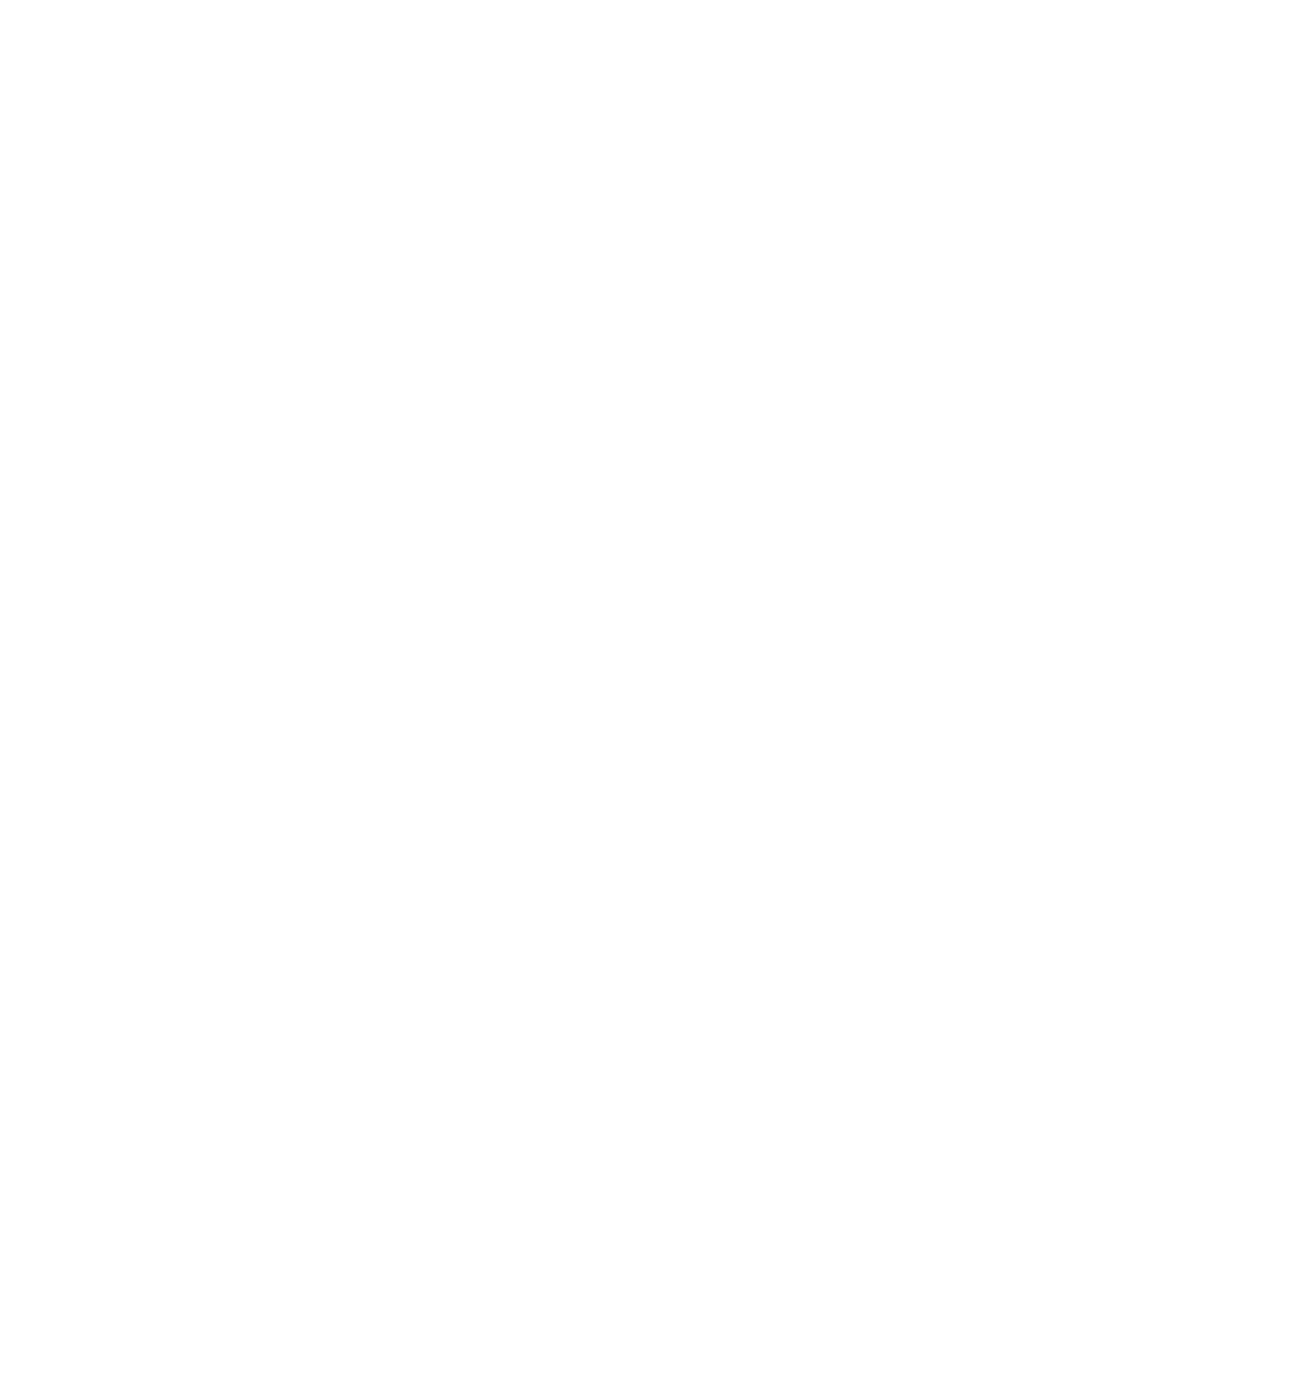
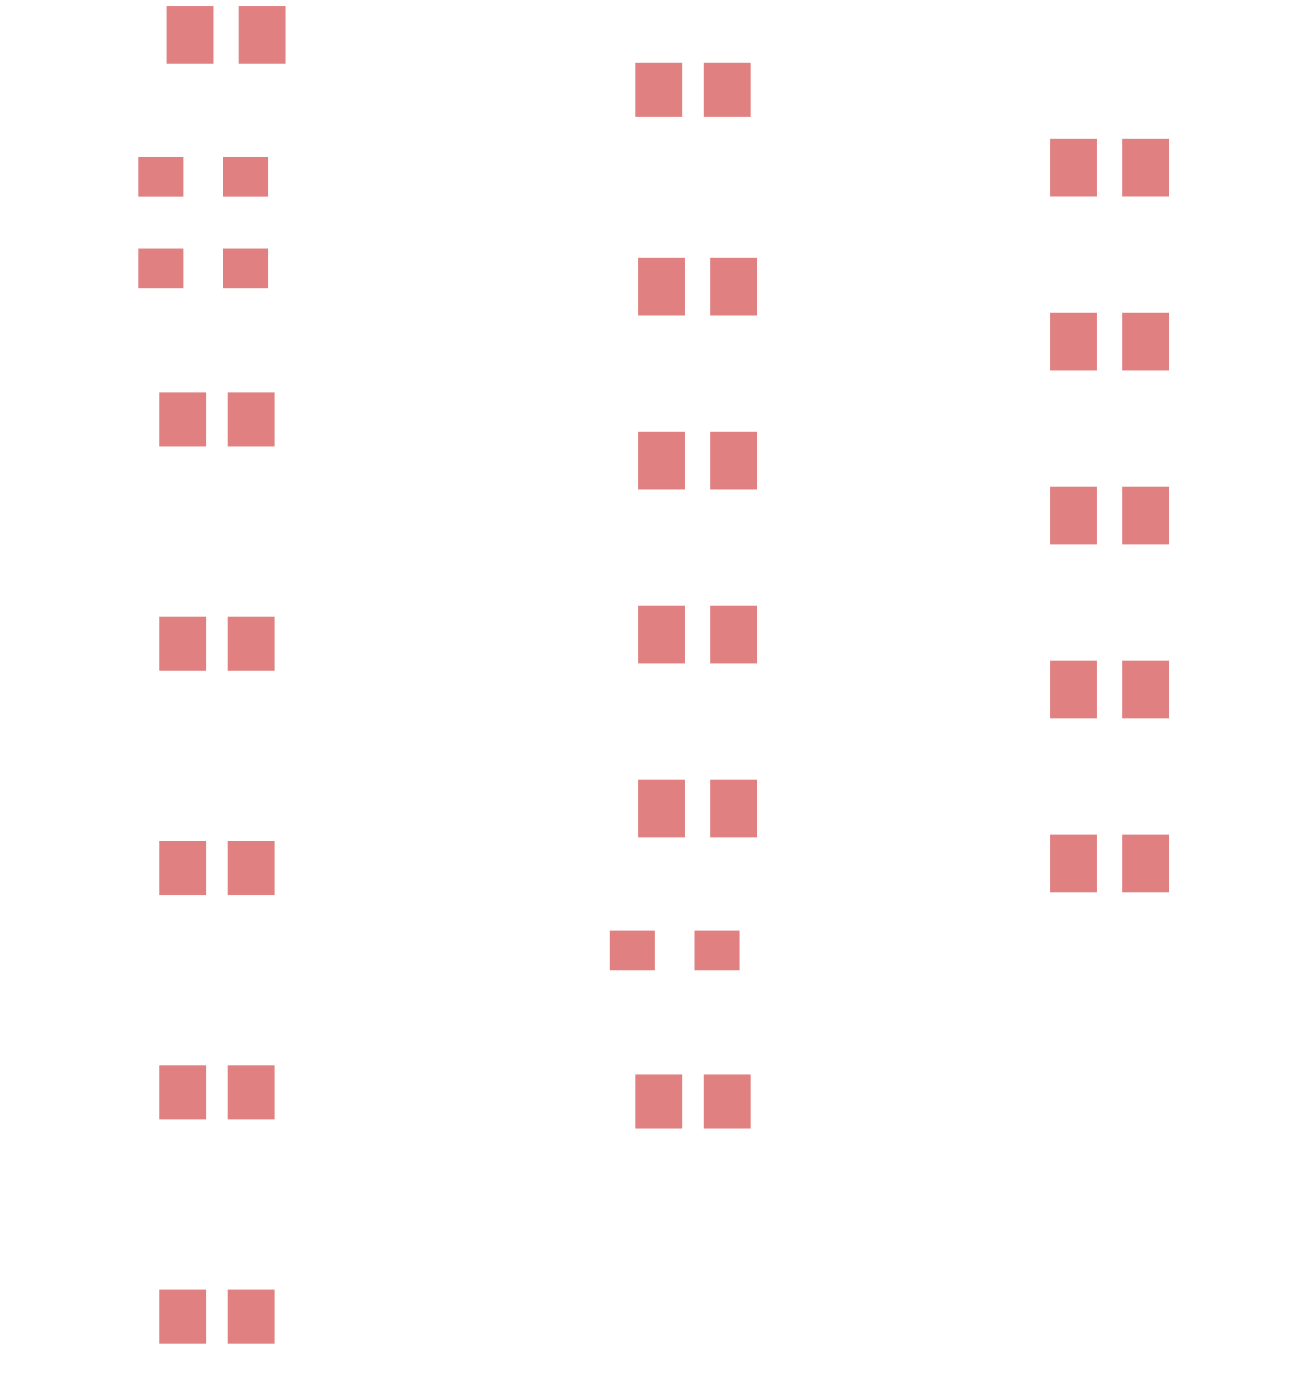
part: none -> (226, 34)
part: none -> (692, 89)
part: none -> (1109, 167)
part: none -> (203, 176)
part: none -> (203, 268)
part: none -> (697, 286)
part: none -> (1109, 341)
part: none -> (216, 419)
part: none -> (697, 460)
part: none -> (1109, 515)
part: none -> (697, 634)
part: none -> (216, 643)
part: none -> (1109, 689)
part: none -> (697, 808)
part: none -> (1109, 863)
part: none -> (216, 868)
part: none -> (674, 950)
part: none -> (216, 1092)
part: none -> (692, 1101)
part: none -> (216, 1316)

